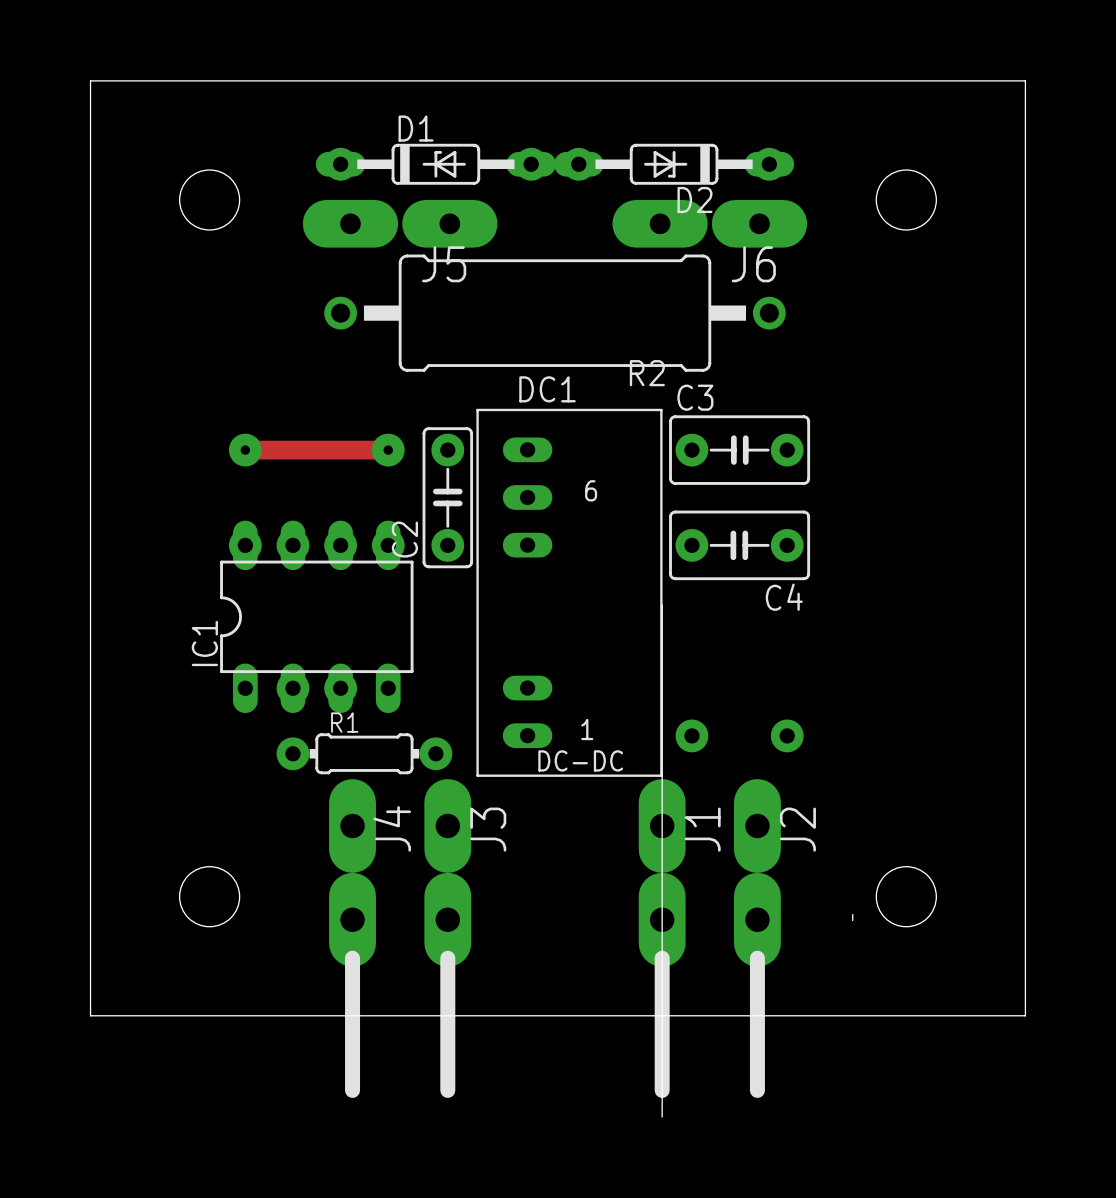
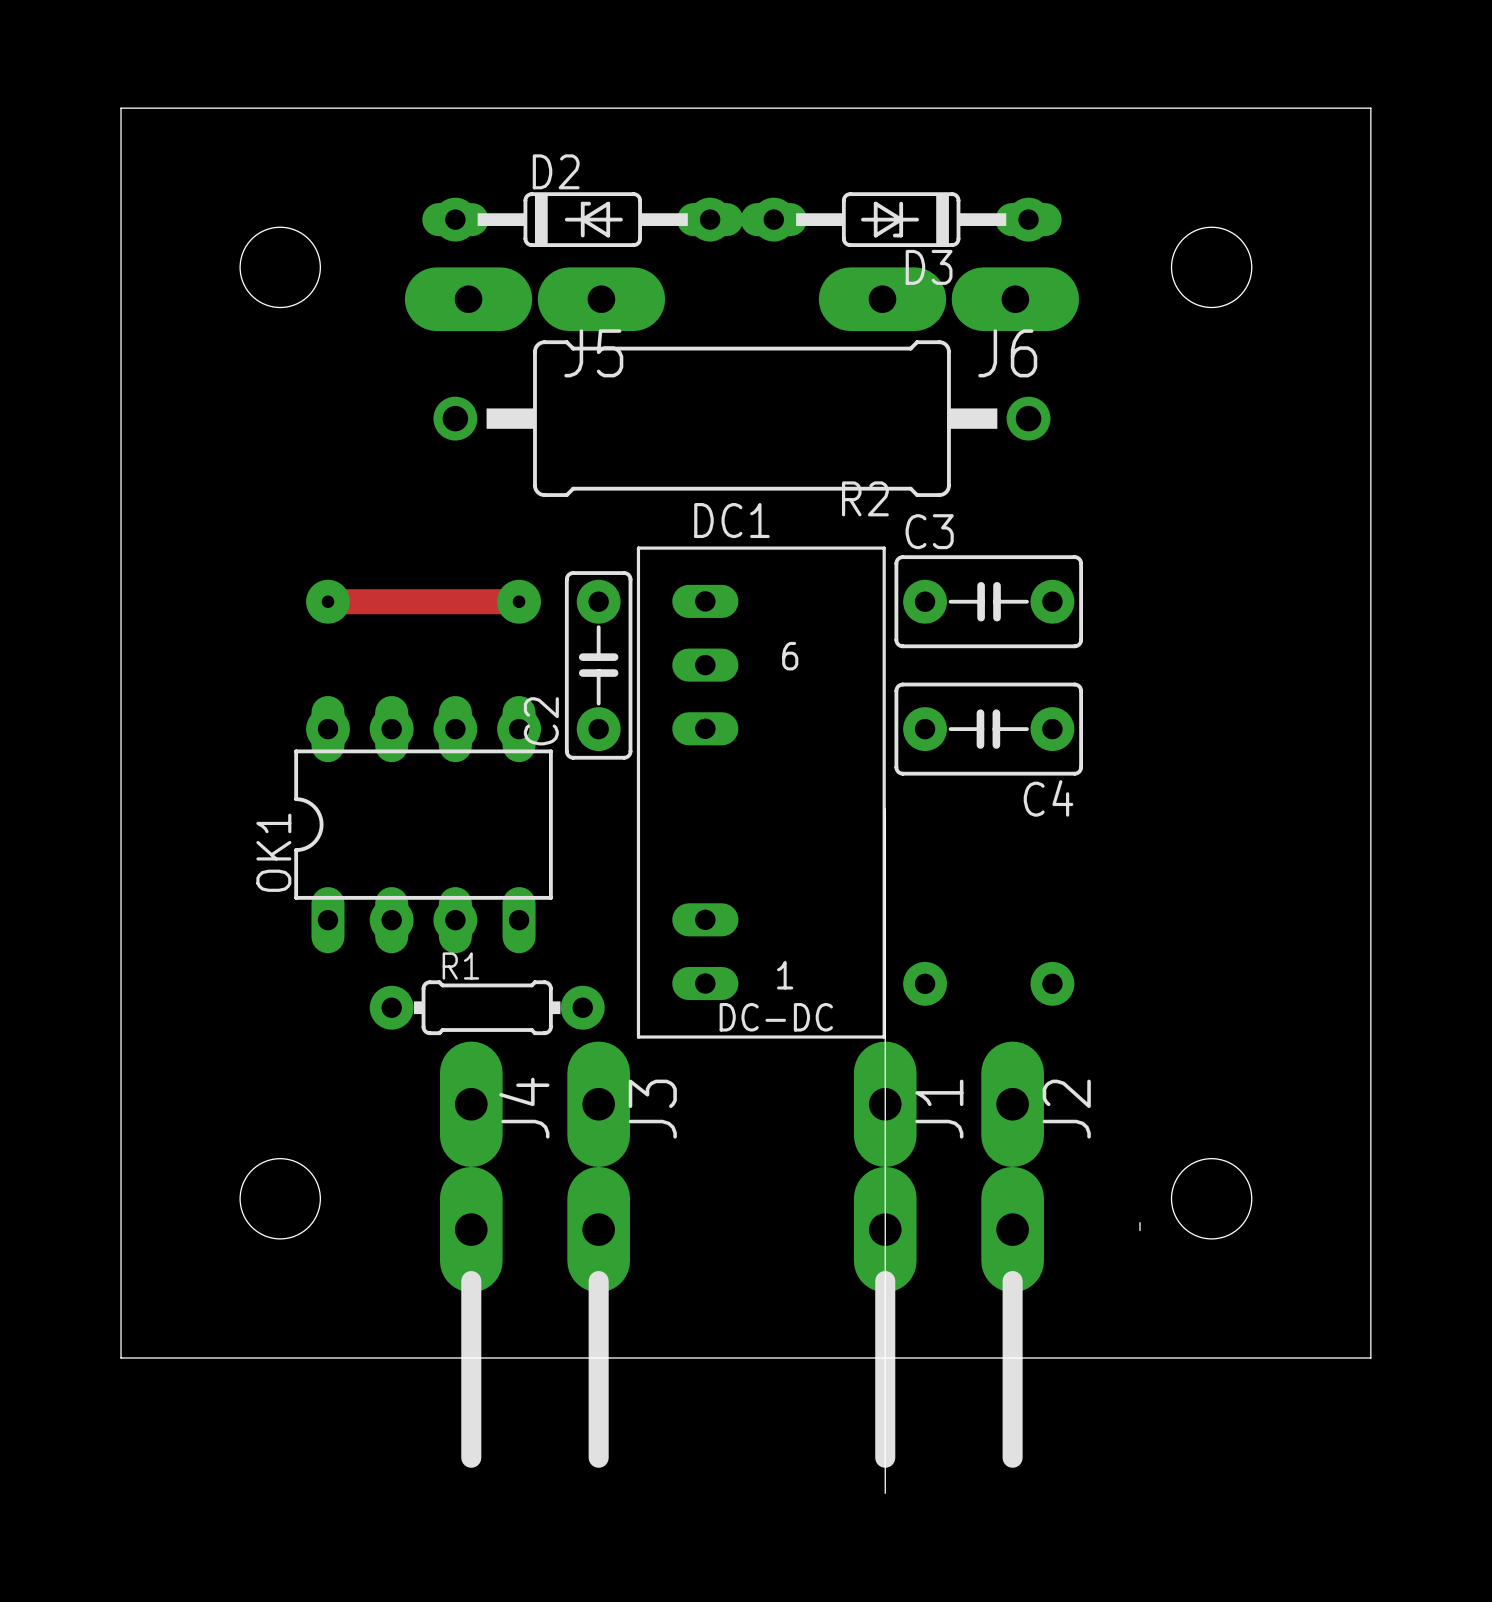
D1 name: D1 (416, 128) -> D2 (556, 171)
D2 name: D2 (694, 200) -> D3 (929, 267)
IC1 name: IC1 (204, 643) -> OK1 (273, 852)

